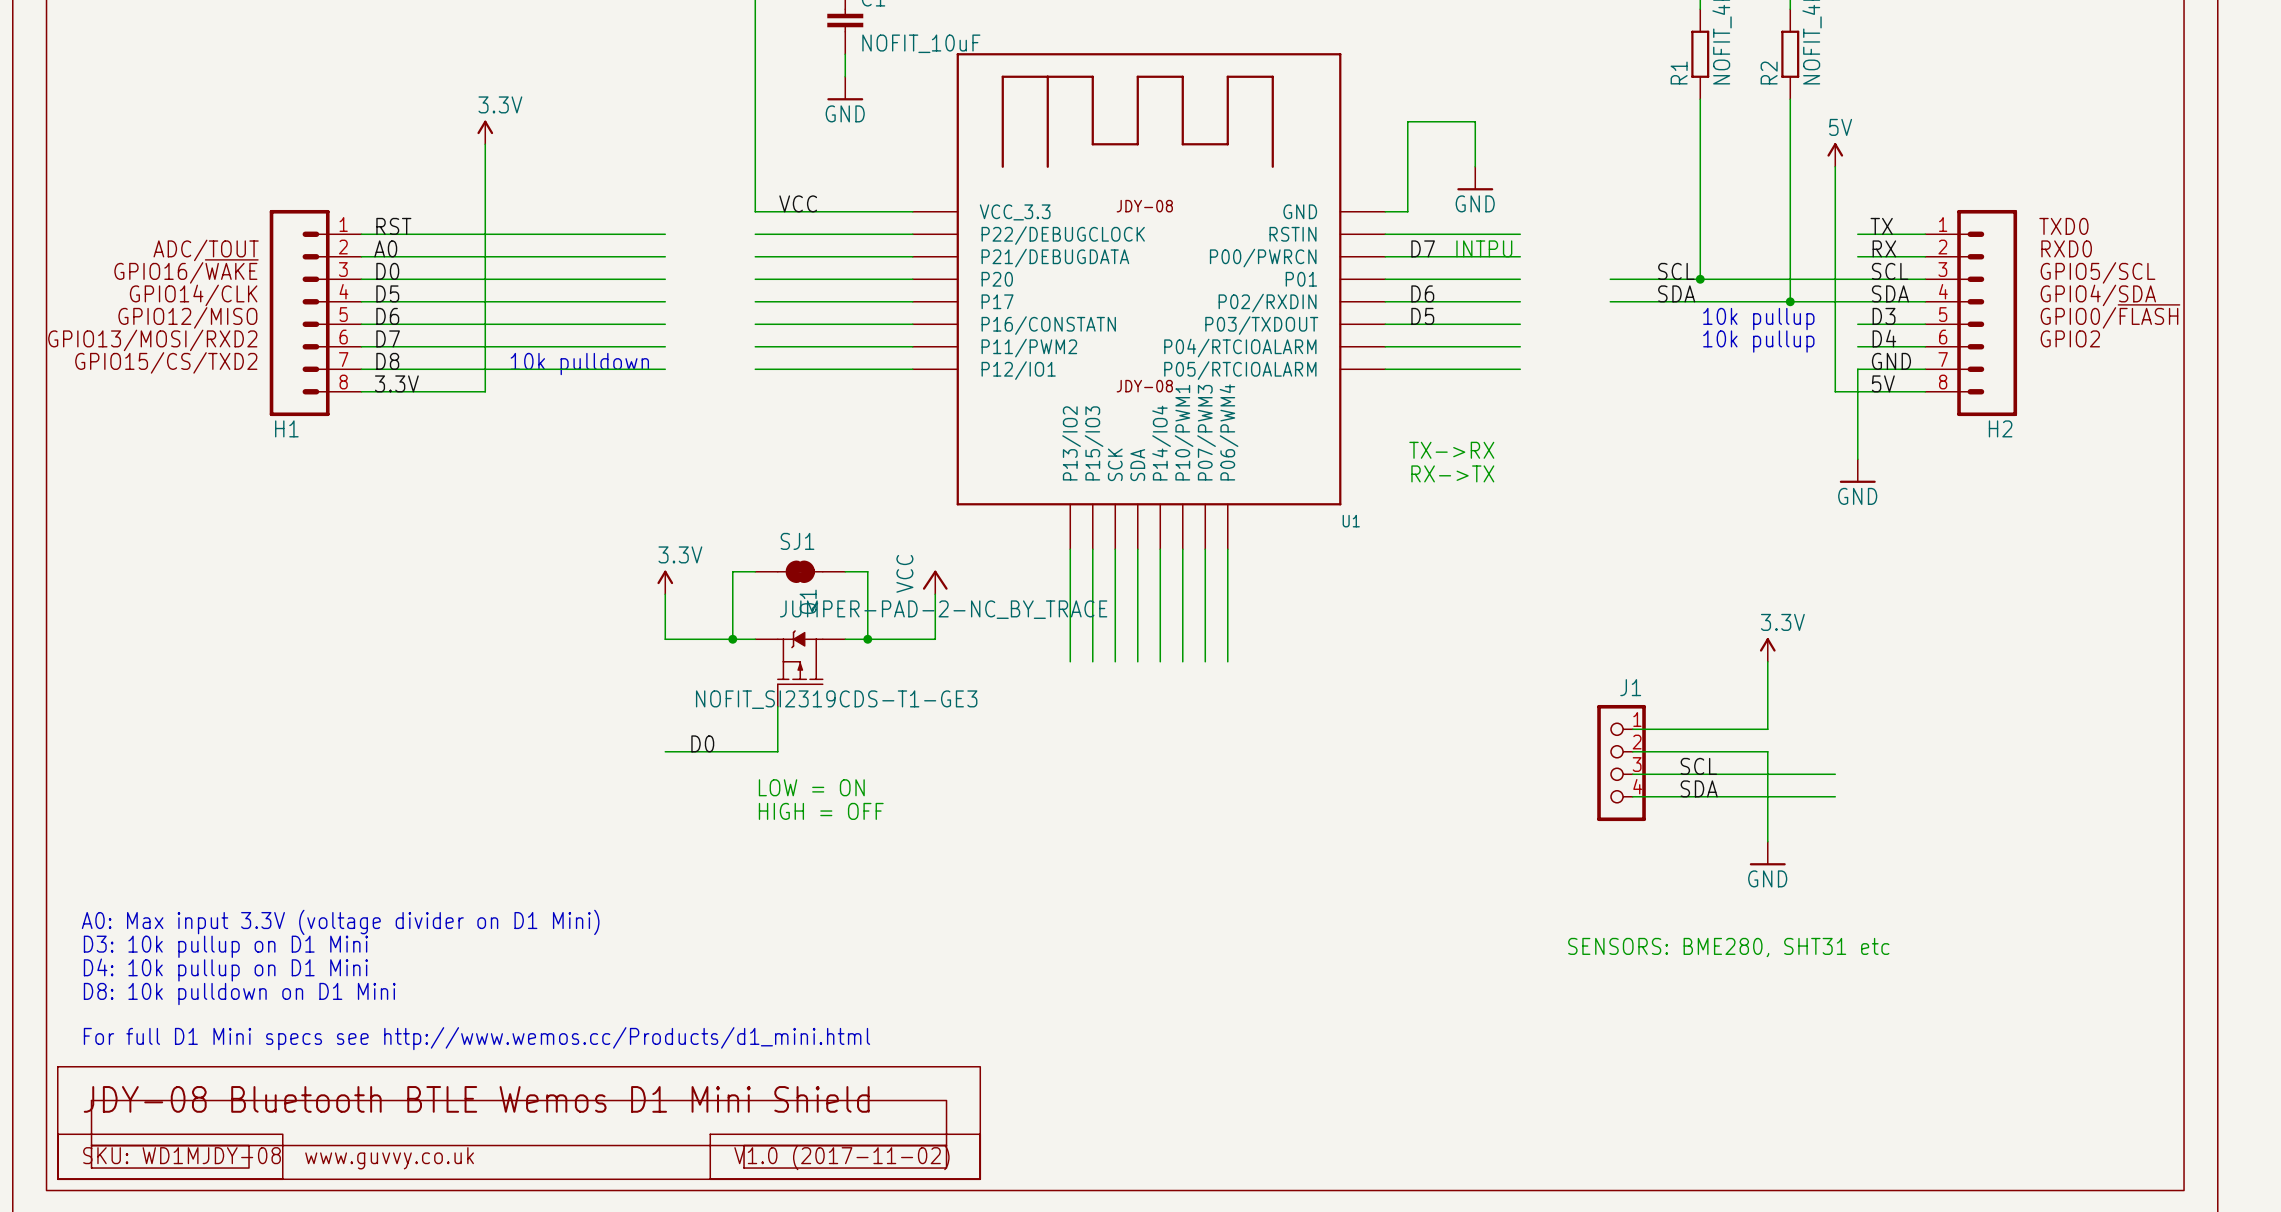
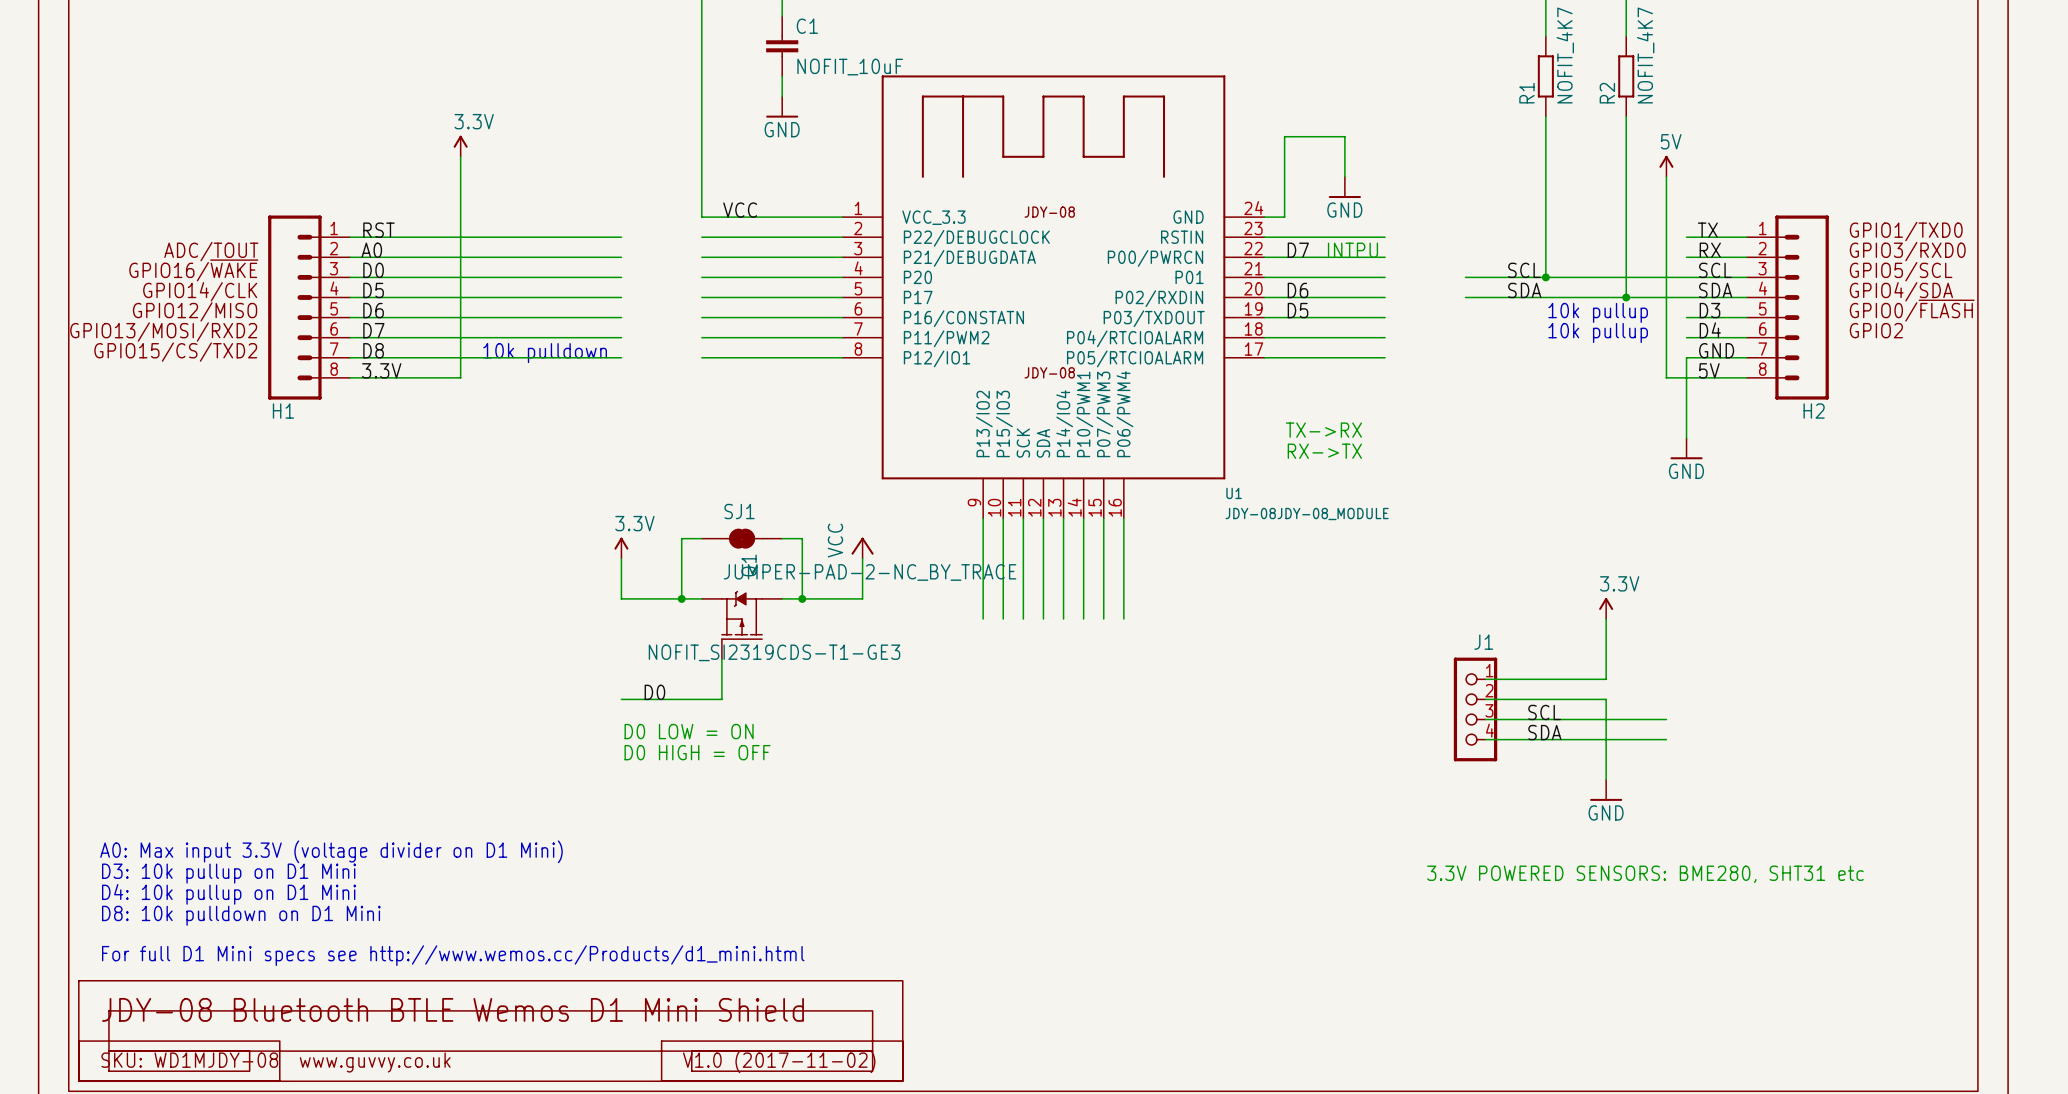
U1 symbol: [912, 53, 1386, 550] -> [842, 75, 1265, 519]
text: TXD0 (2063, 226) -> GPIO1/TXD0 (1906, 231)
text: RXD0 (2066, 248) -> GPIO3/RXD0 (1907, 251)
U1 value: none -> JDY-08JDY-08_MODULE (1307, 514)
text: LOW = ON (811, 787) -> D0 LOW = ON (689, 731)
text: HIGH = OFF (821, 811) -> D0 HIGH = OFF (697, 752)
text: SENSORS: BME280, SHT31 etc (1728, 947) -> 3.3V POWERED SENSORS: BME280, SHT31 etc (1645, 874)

